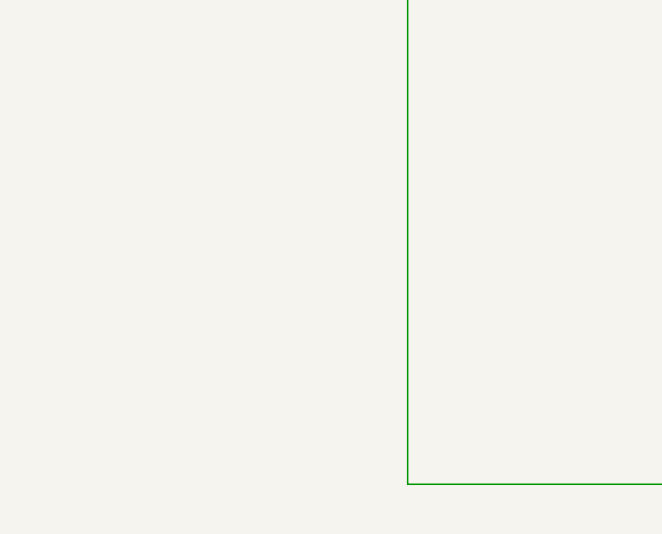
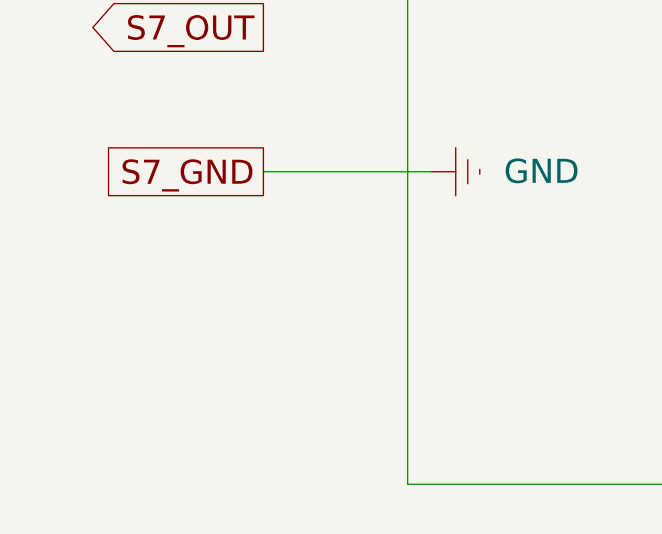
global label: none -> S7_OUT (191, 31)
wire: none -> (263, 171) (431, 171)
power symbol: none -> GND (455, 171)
global label: none -> S7_GND (187, 175)

